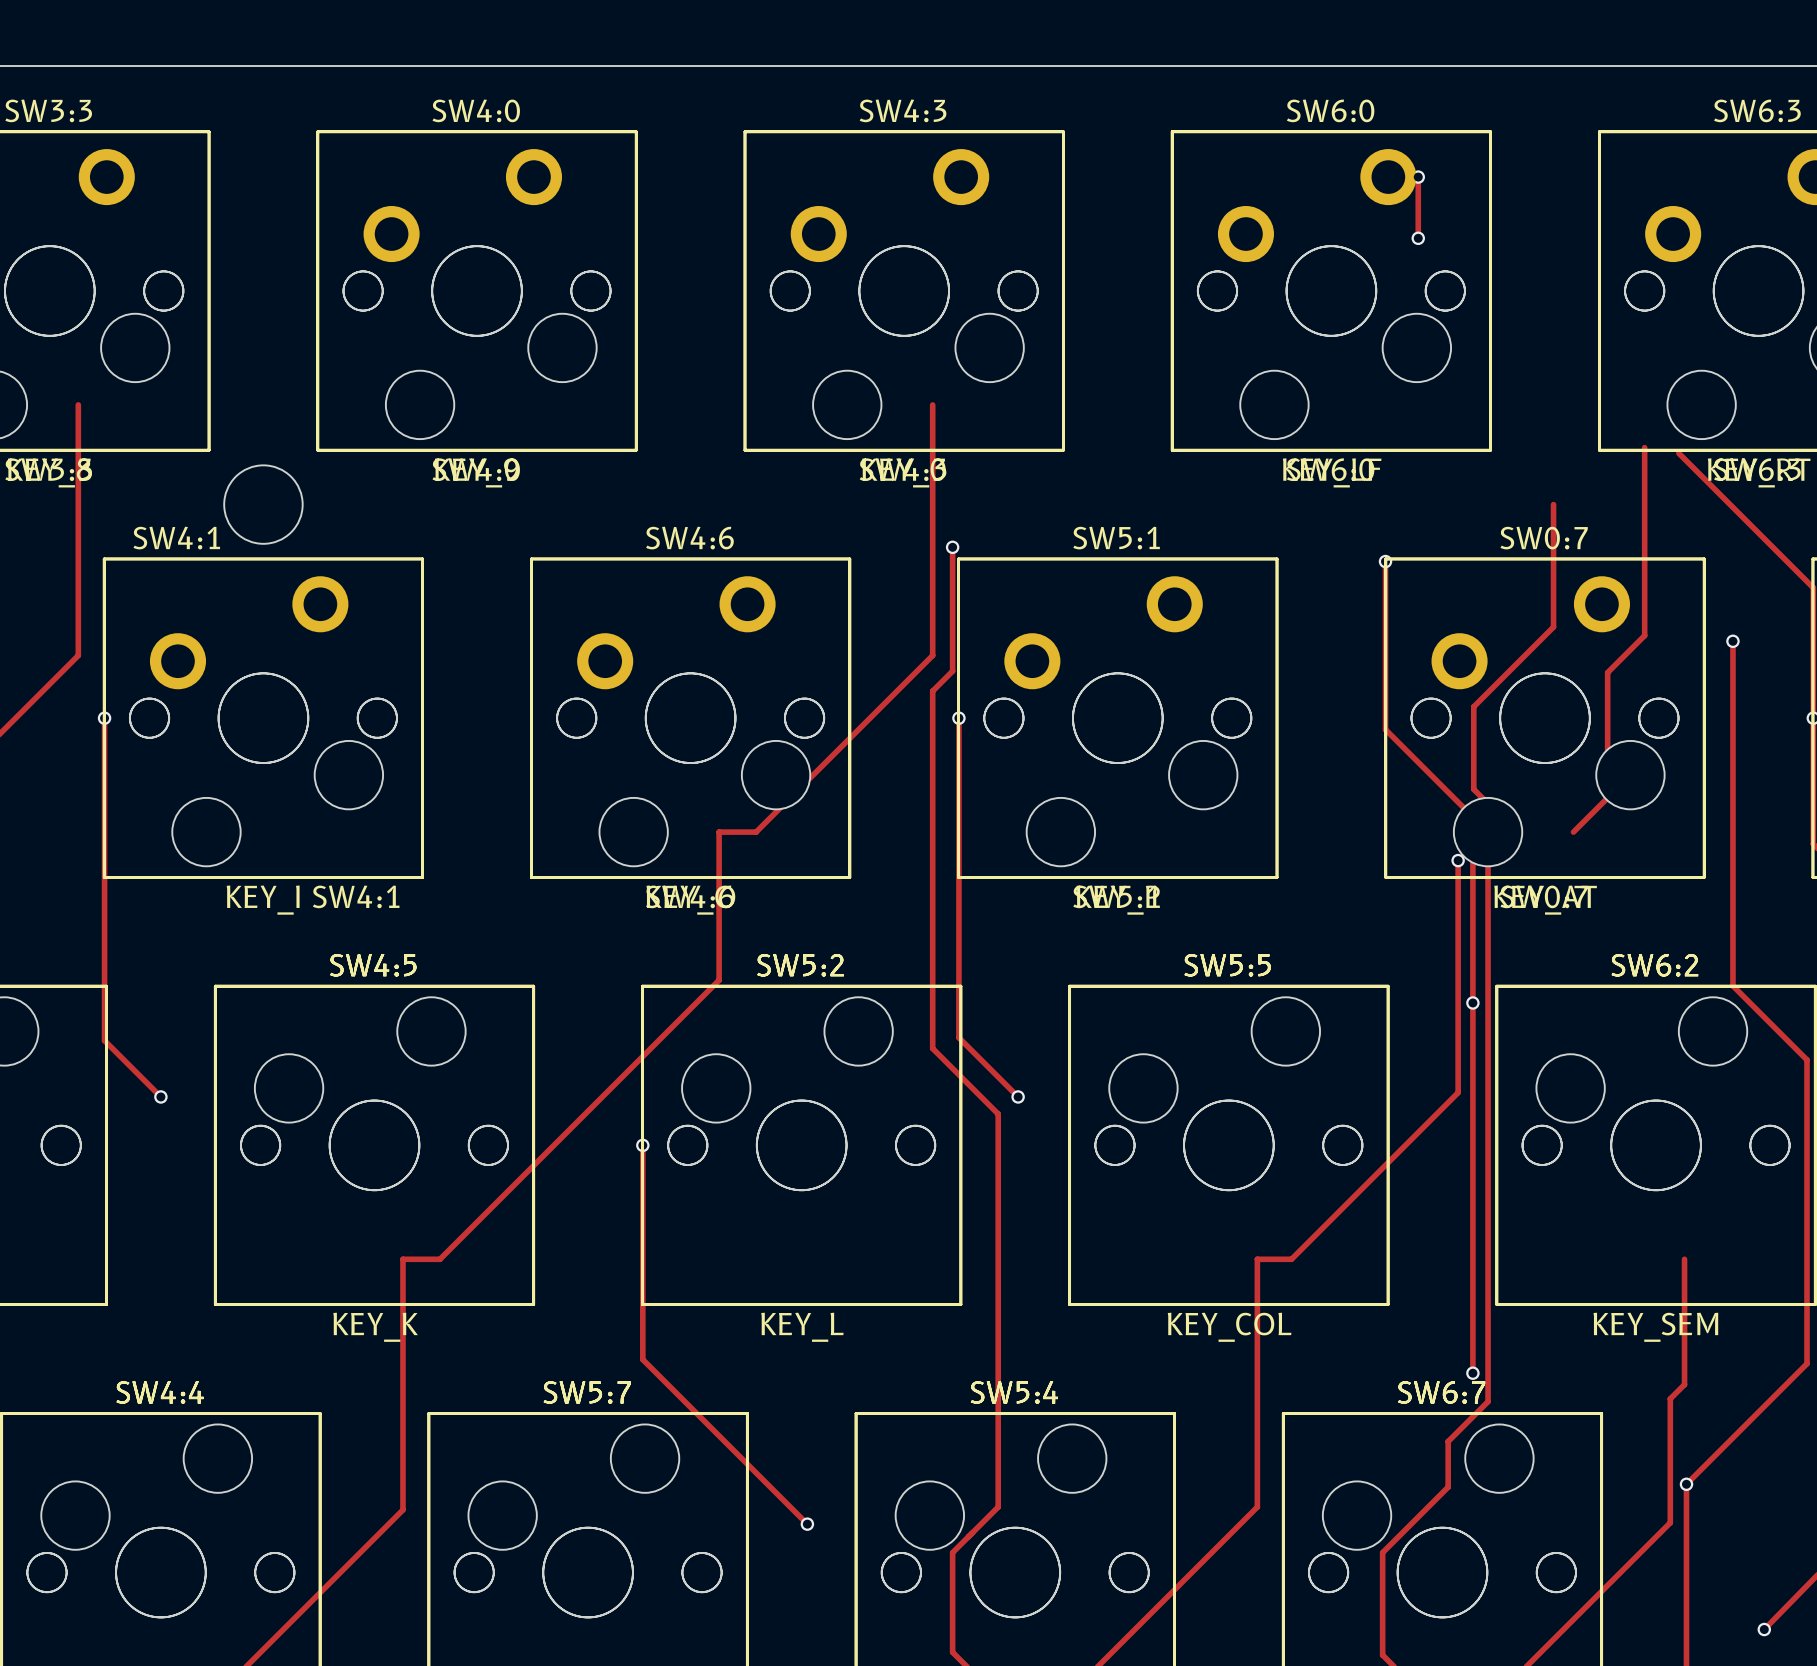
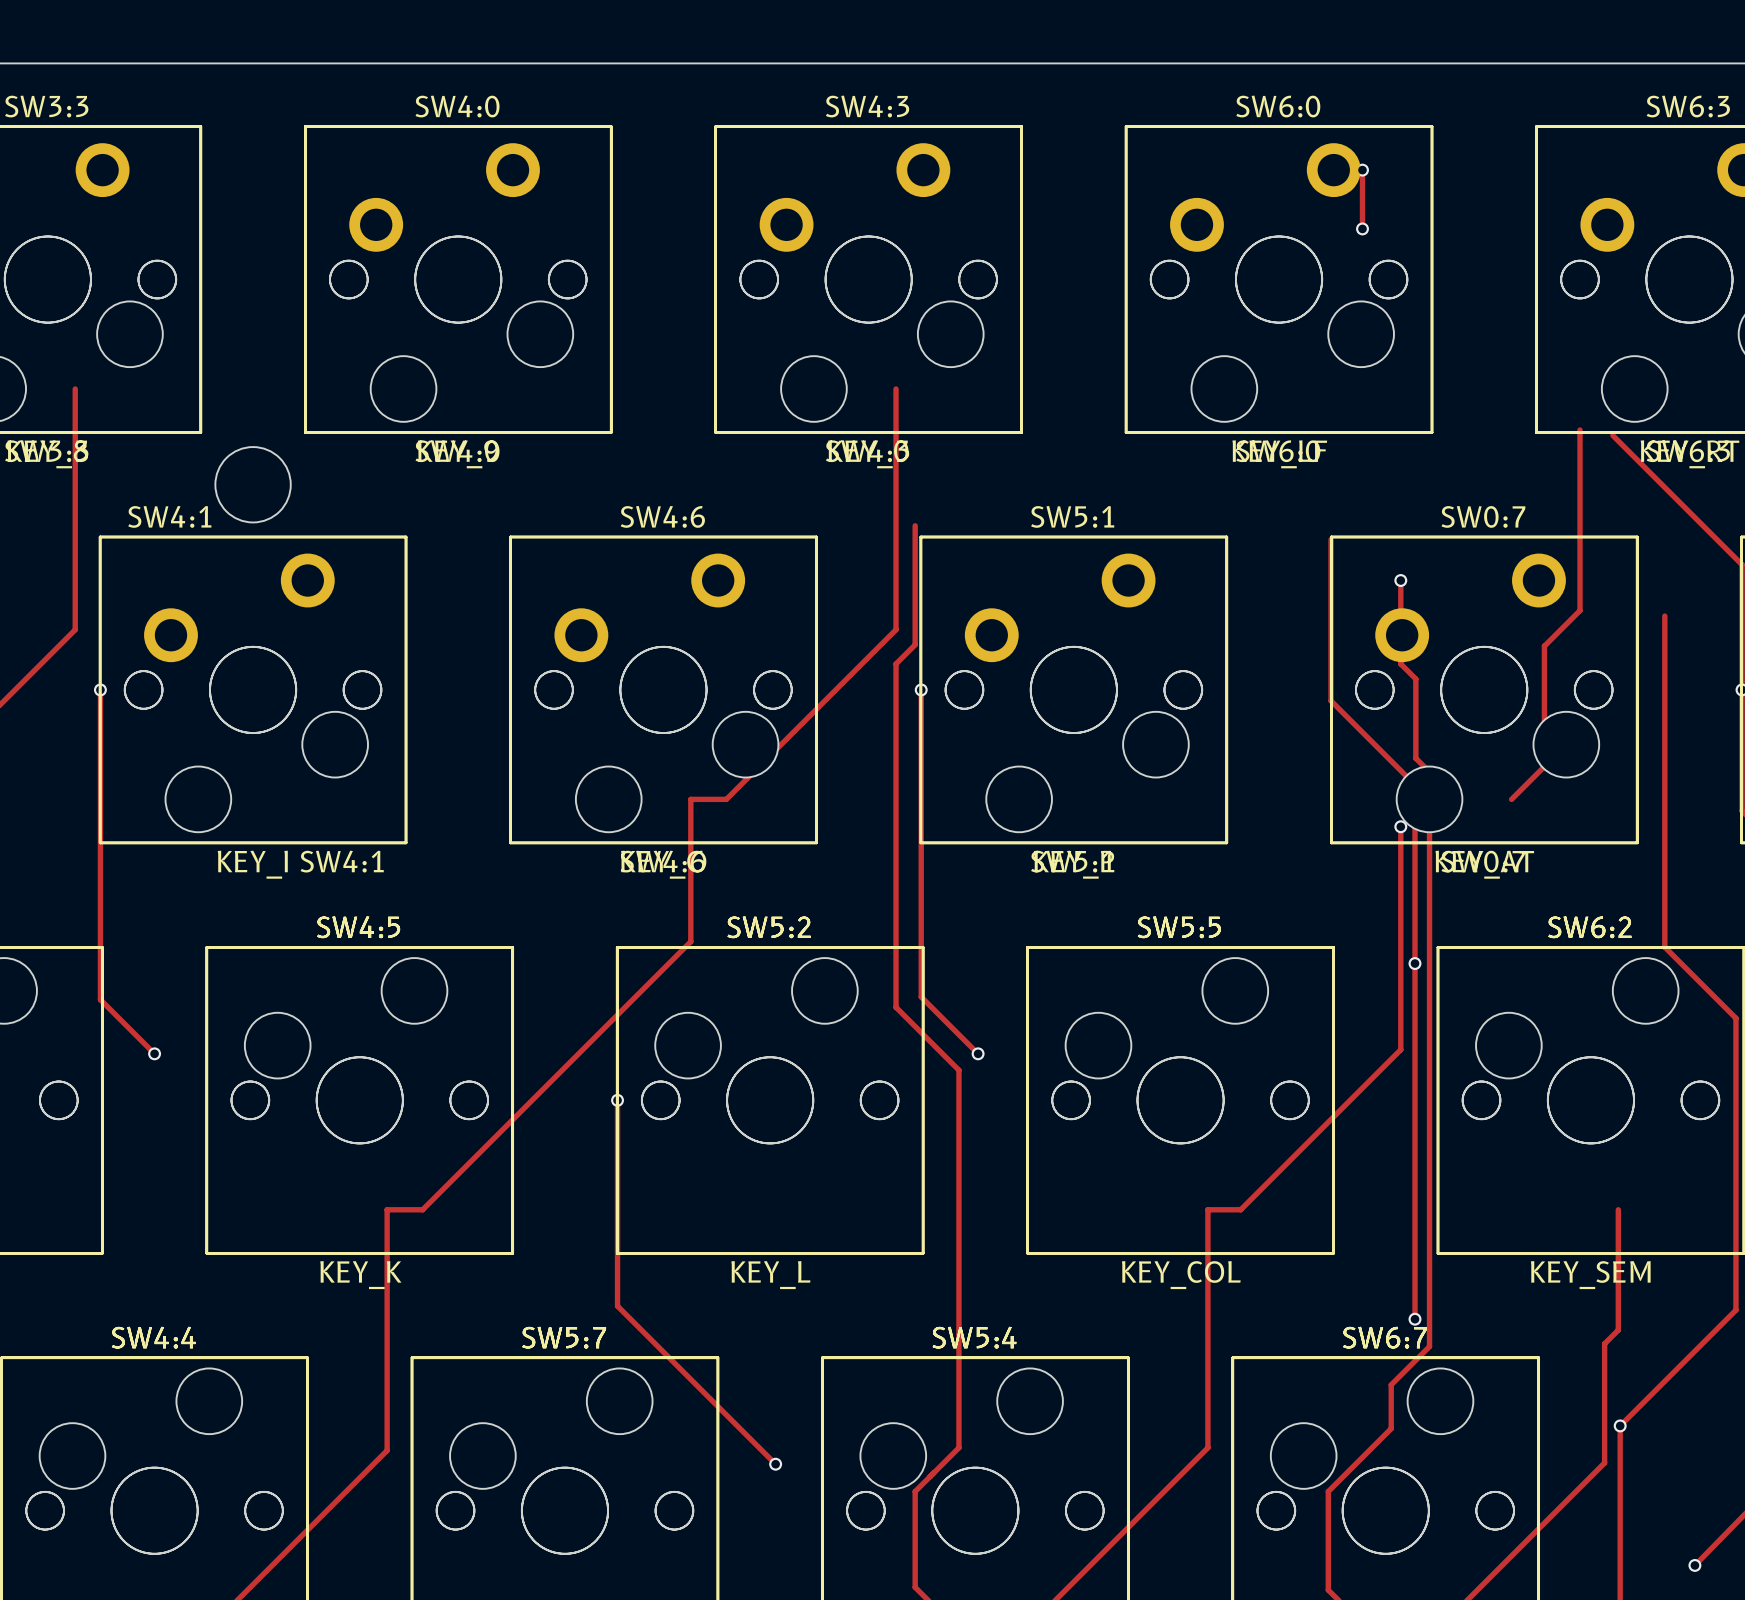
track: (1553, 504) (1553, 627) (1473, 706) -> (1400, 580) (1400, 663) (1415, 679)
via: (952, 547) -> none
via position: (1385, 561) -> (1400, 580)
via: (1732, 641) -> none

